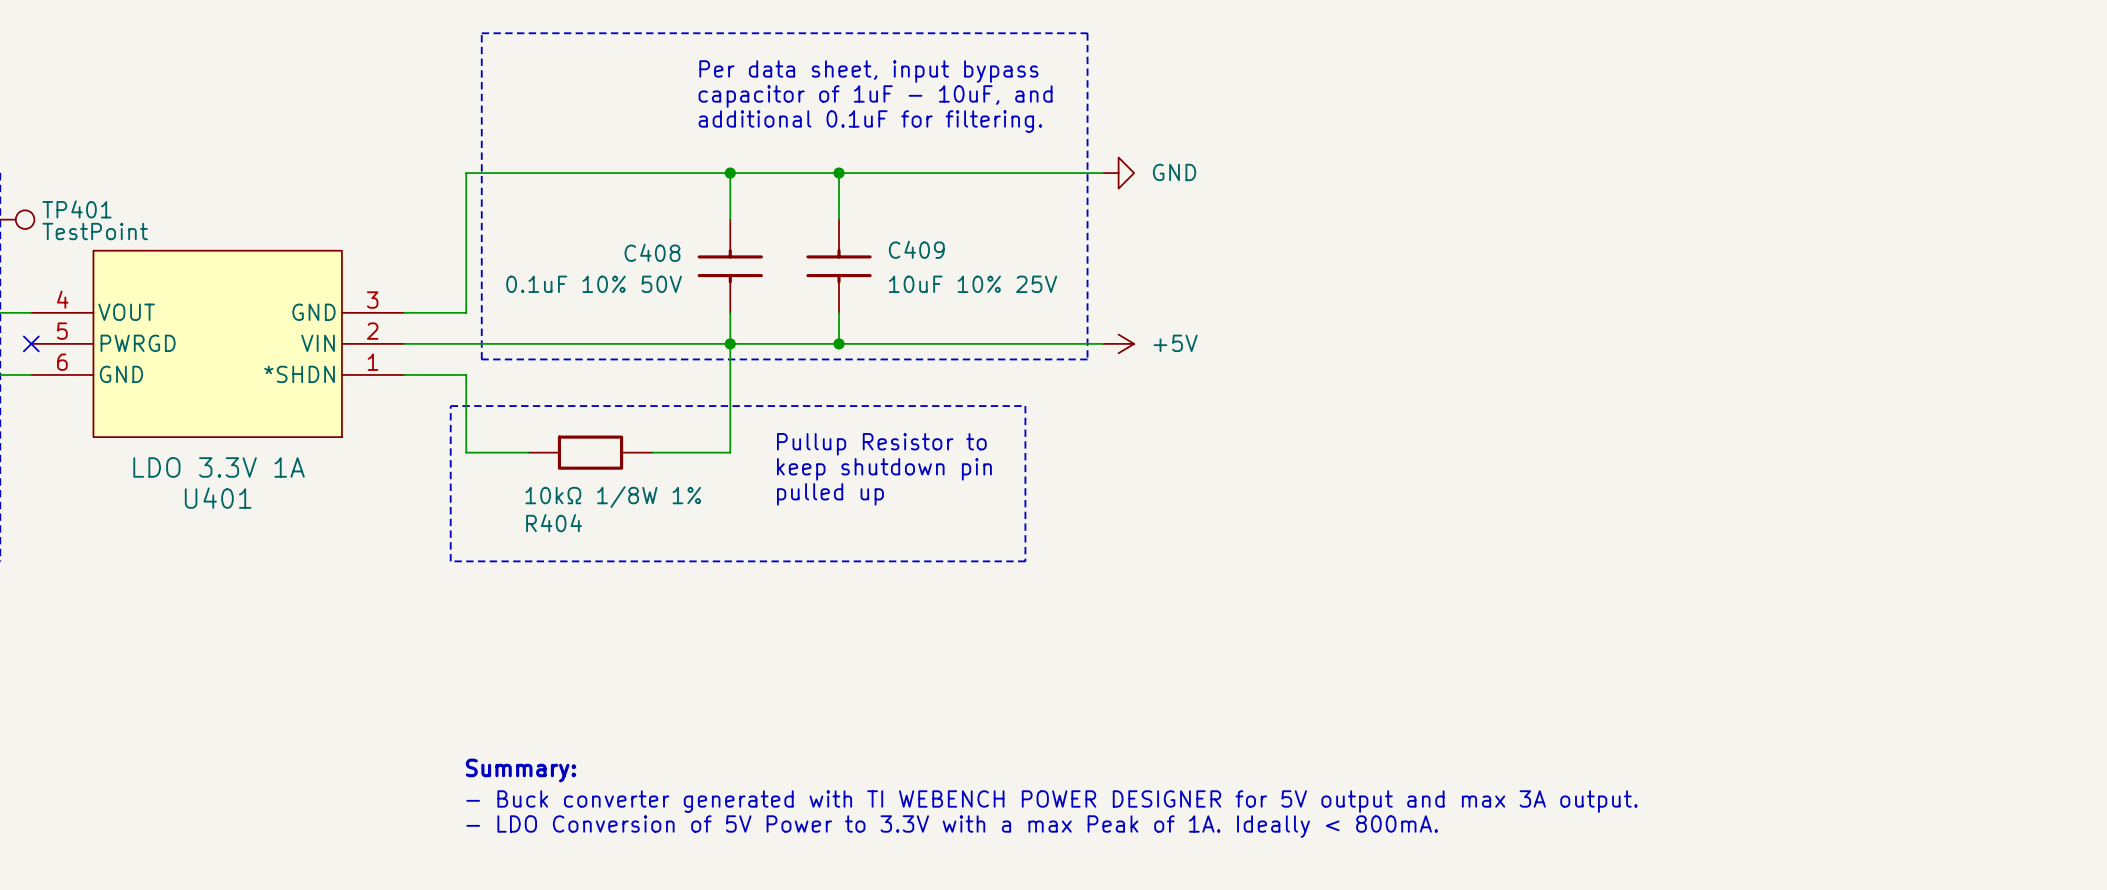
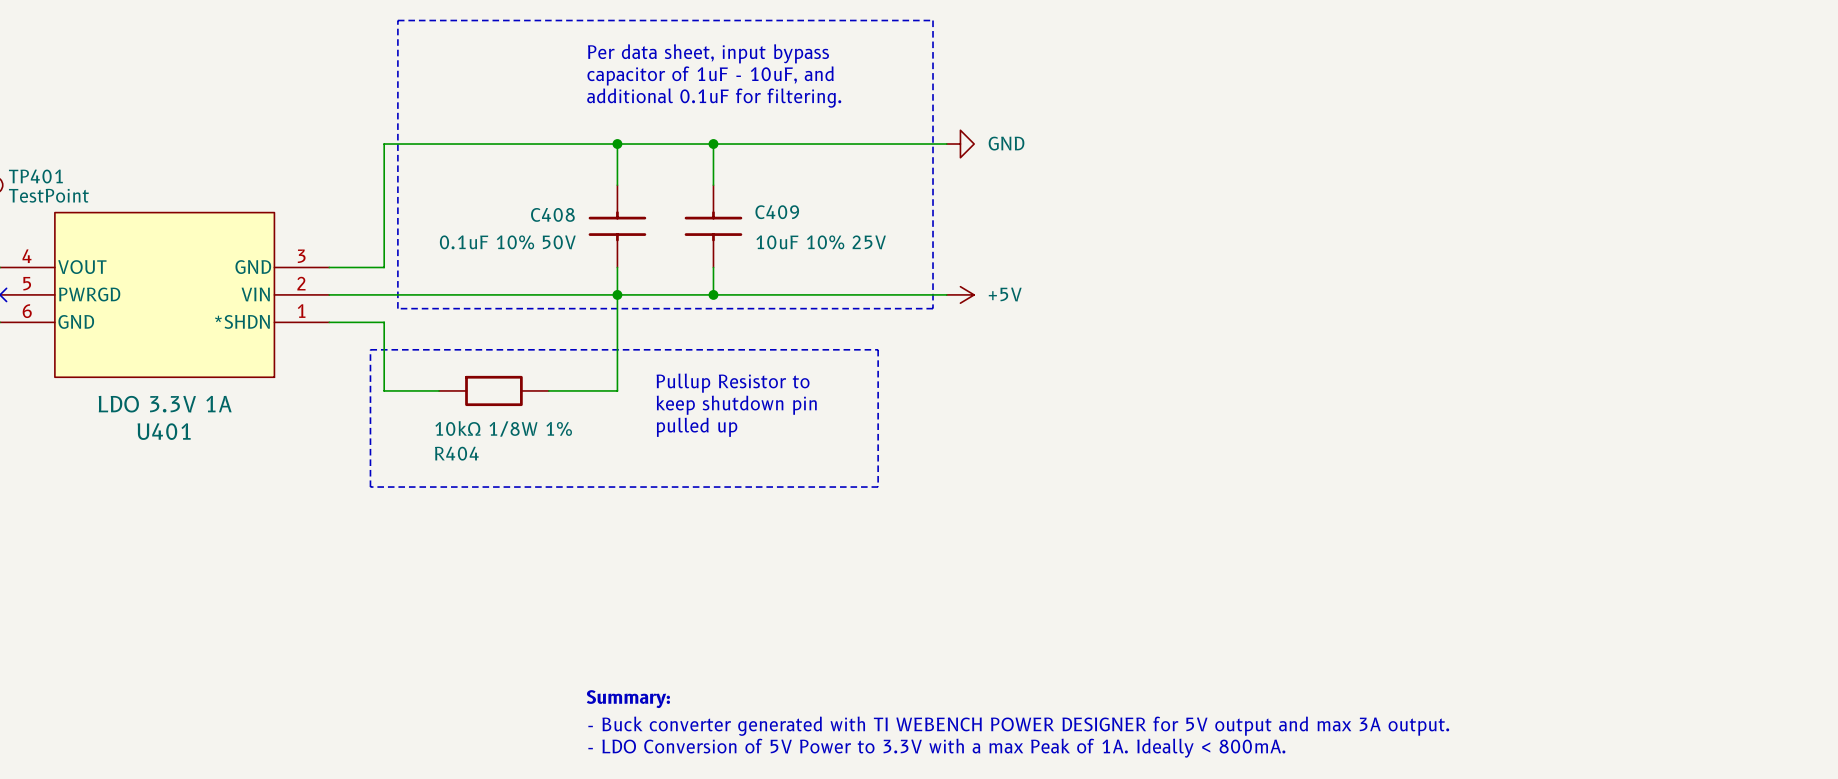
text position: Summary: (520, 770) -> Summary: (628, 699)
text position: - Buck converter generated with TI WEBENCH POWER DESIGNER for 5V output and max 3A output. (1051, 801) -> - Buck converter generated with TI WEBENCH POWER DESIGNER for 5V output and max 3A output. (1018, 726)
text position: - LDO Conversion of 5V Power to 3.3V with a max Peak of 1A. Ideally < 800mA. (952, 826) -> - LDO Conversion of 5V Power to 3.3V with a max Peak of 1A. Ideally < 800mA. (936, 748)

